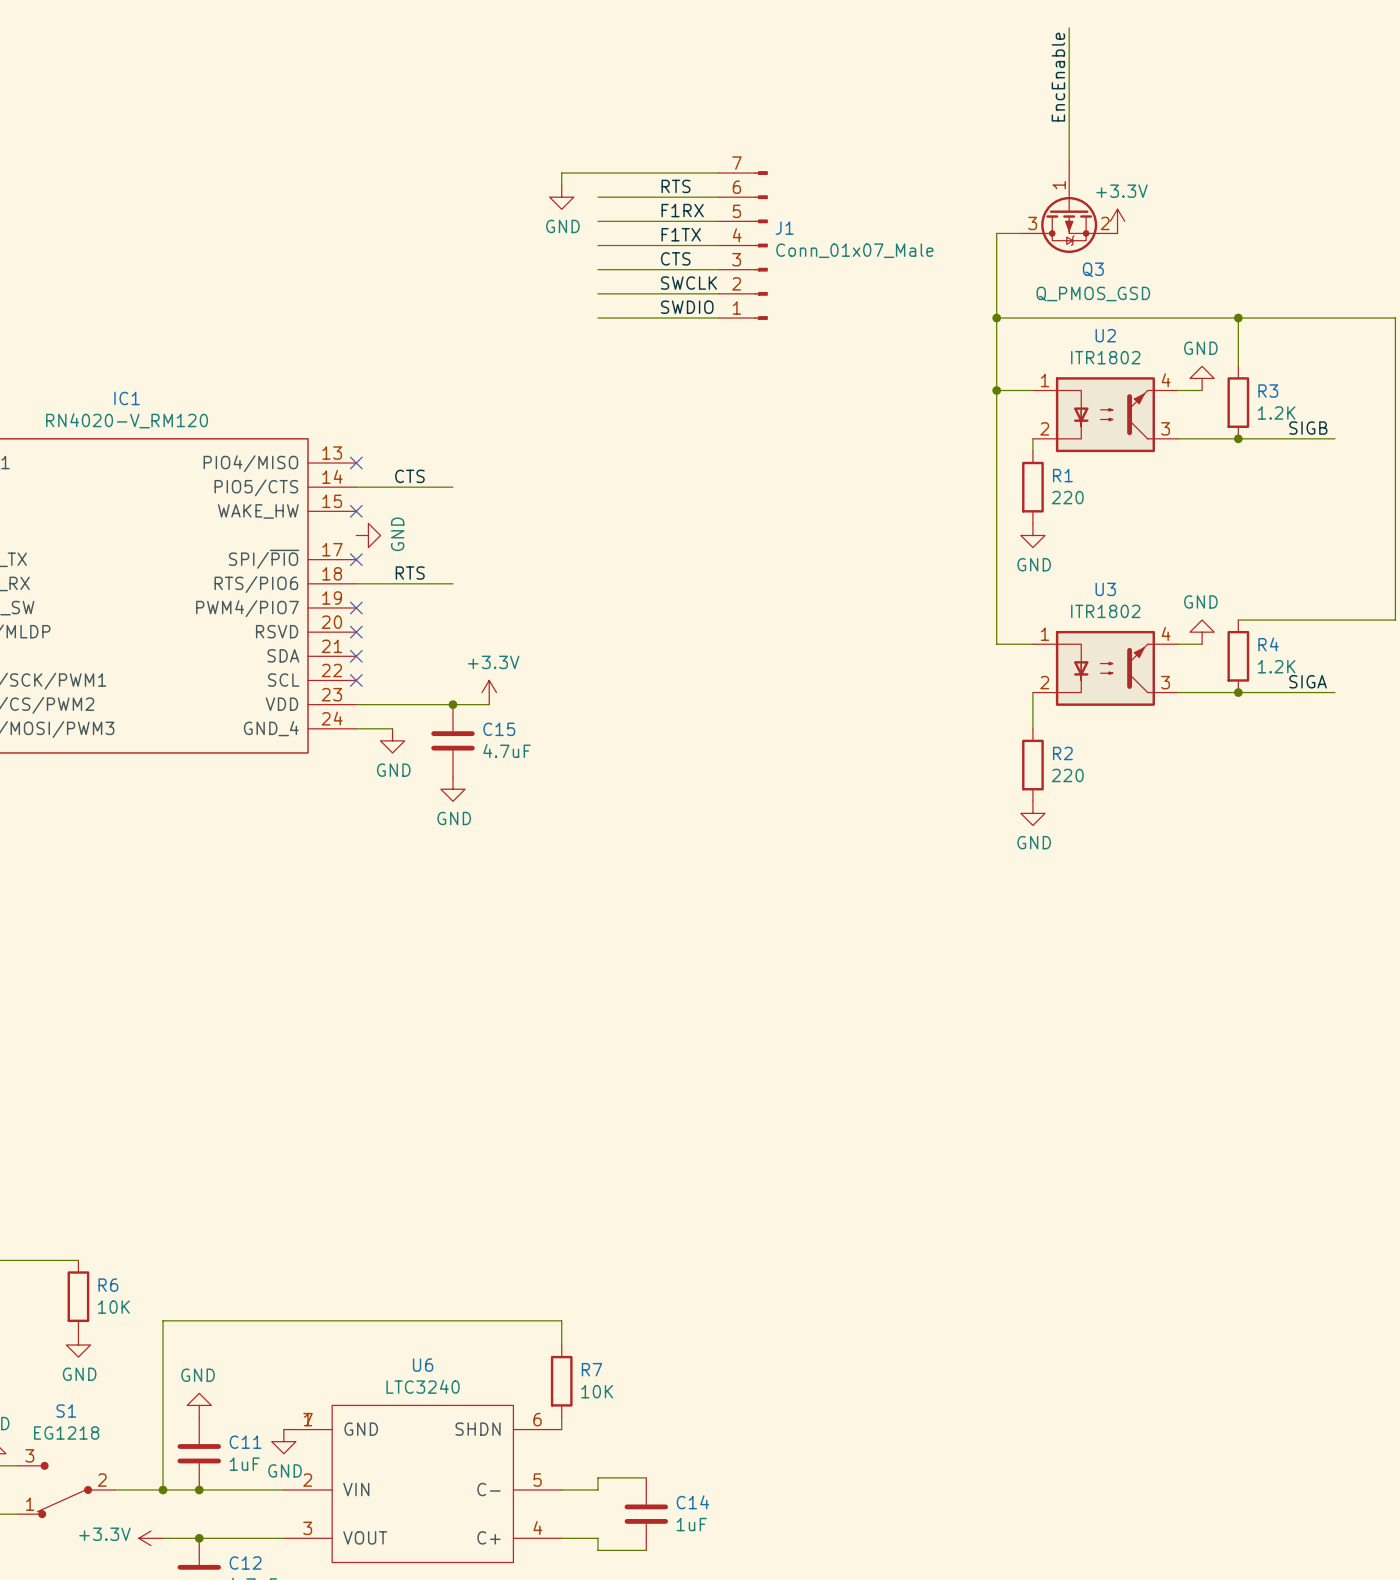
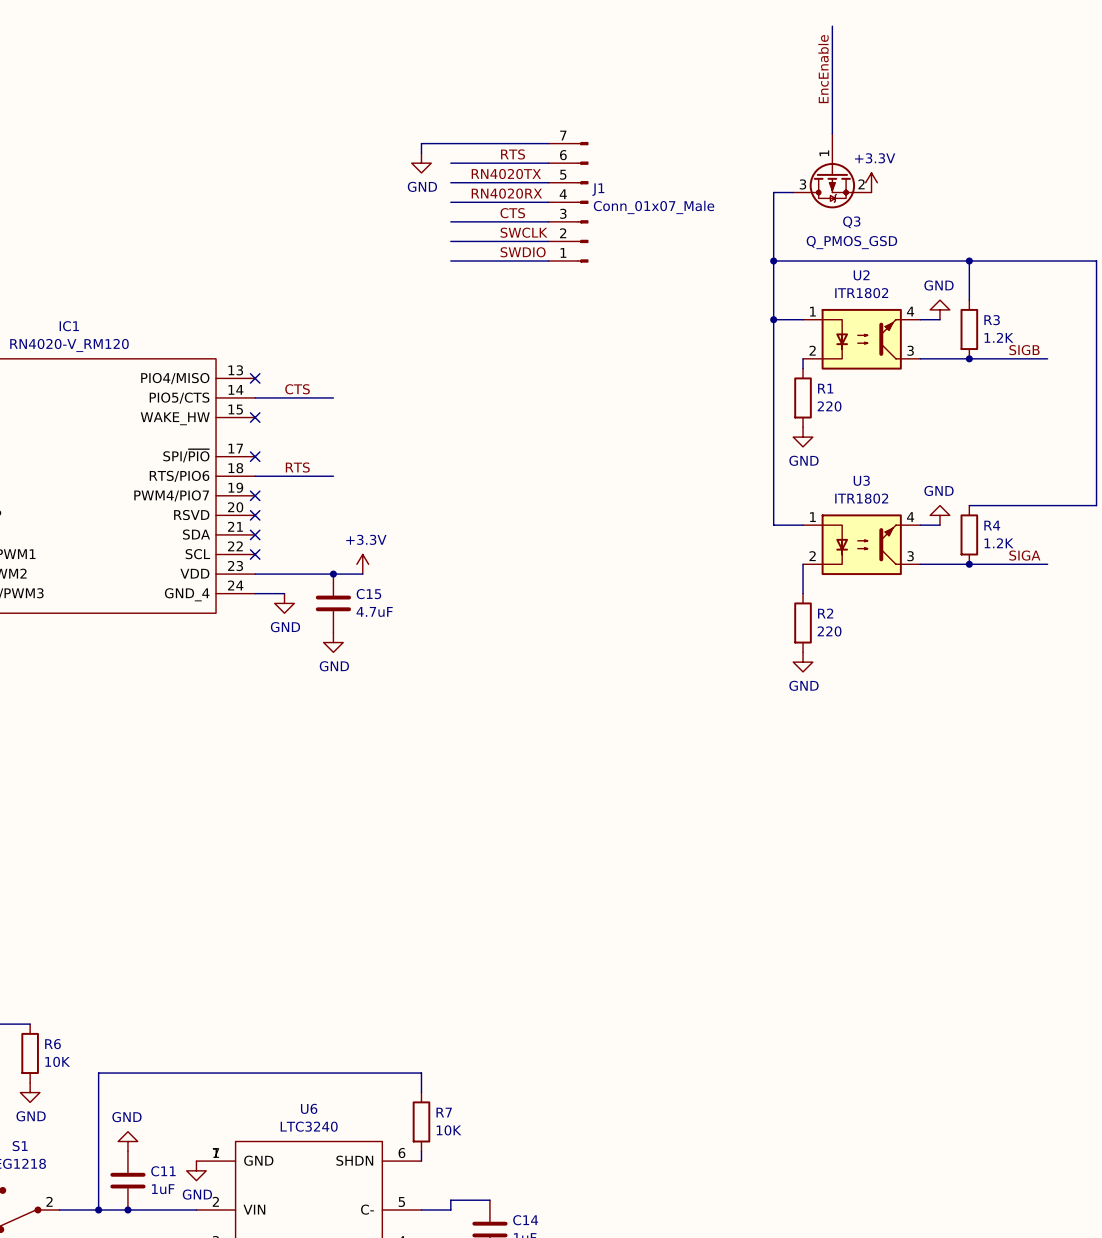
label: none -> RN4020TX (506, 174)
label: F1RX (682, 210) -> none
label: none -> RN4020RX (506, 193)
label: F1TX (681, 234) -> none
power symbol: GND (368, 535) -> none

